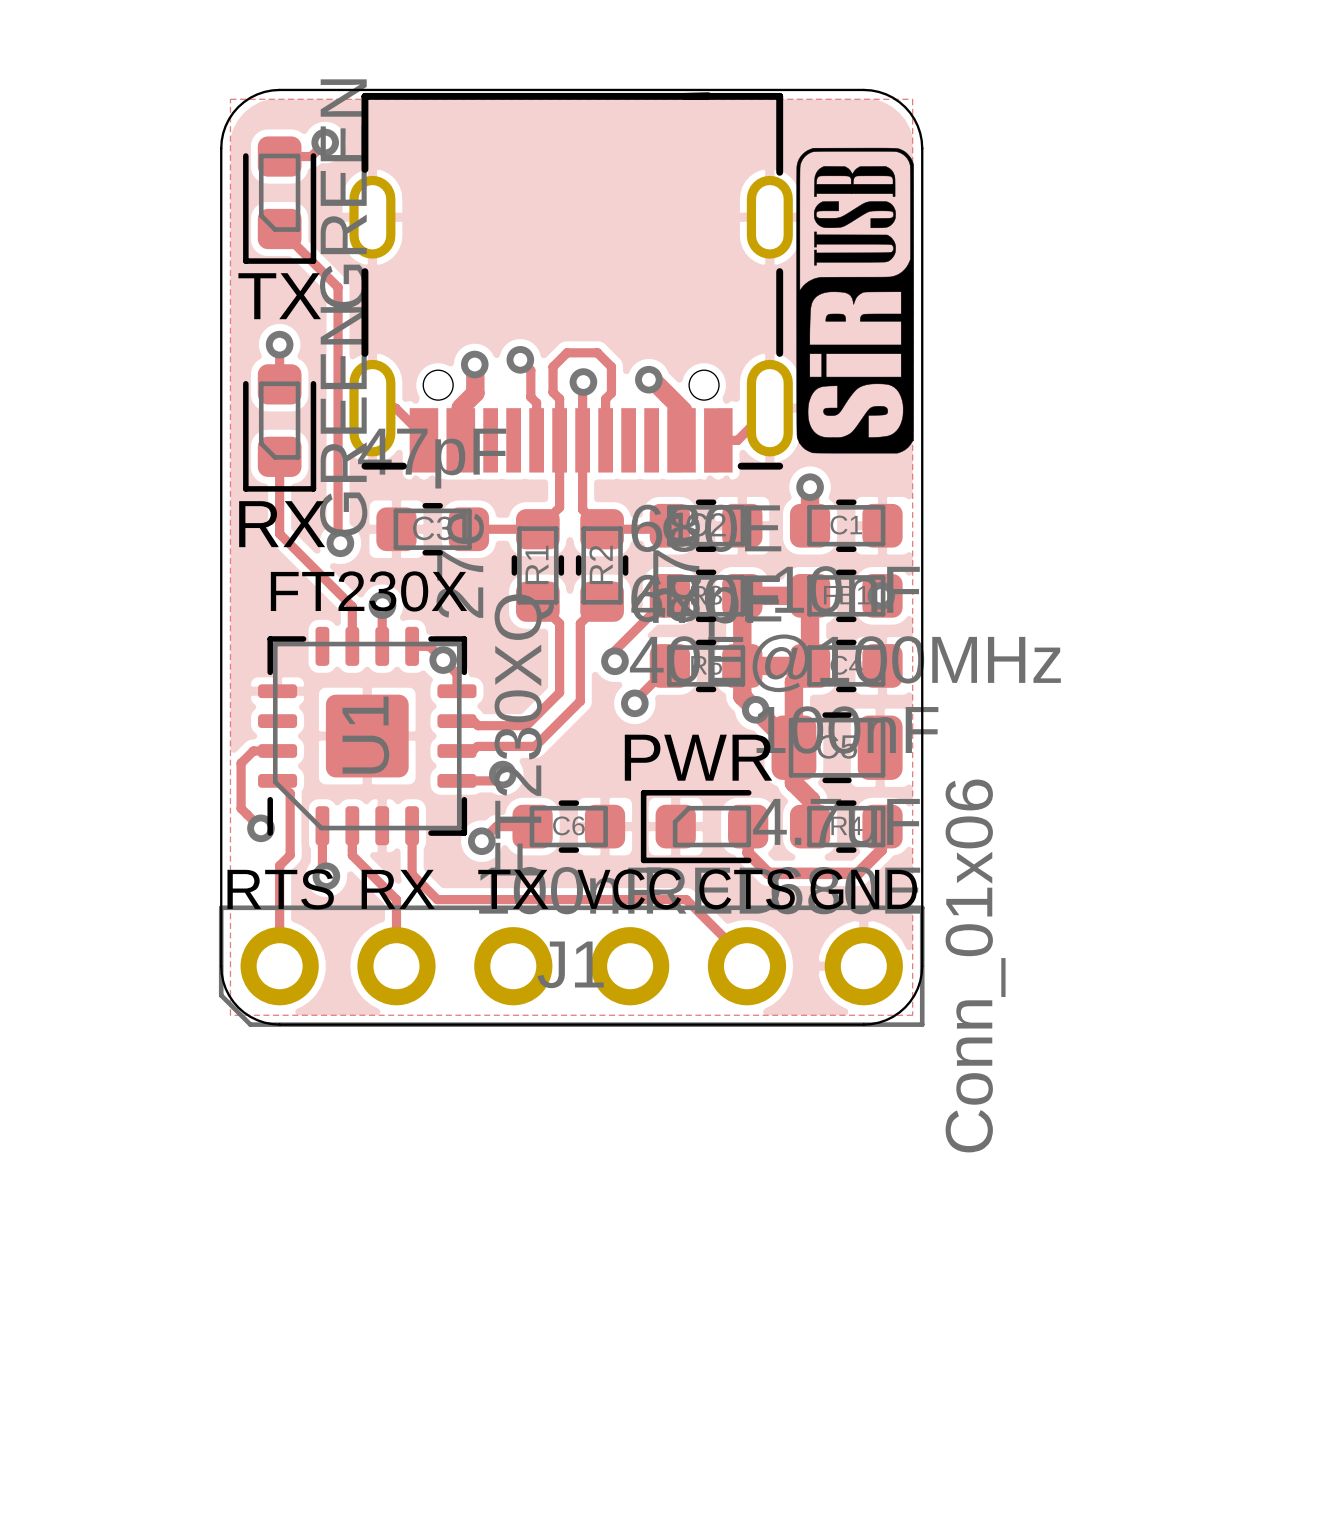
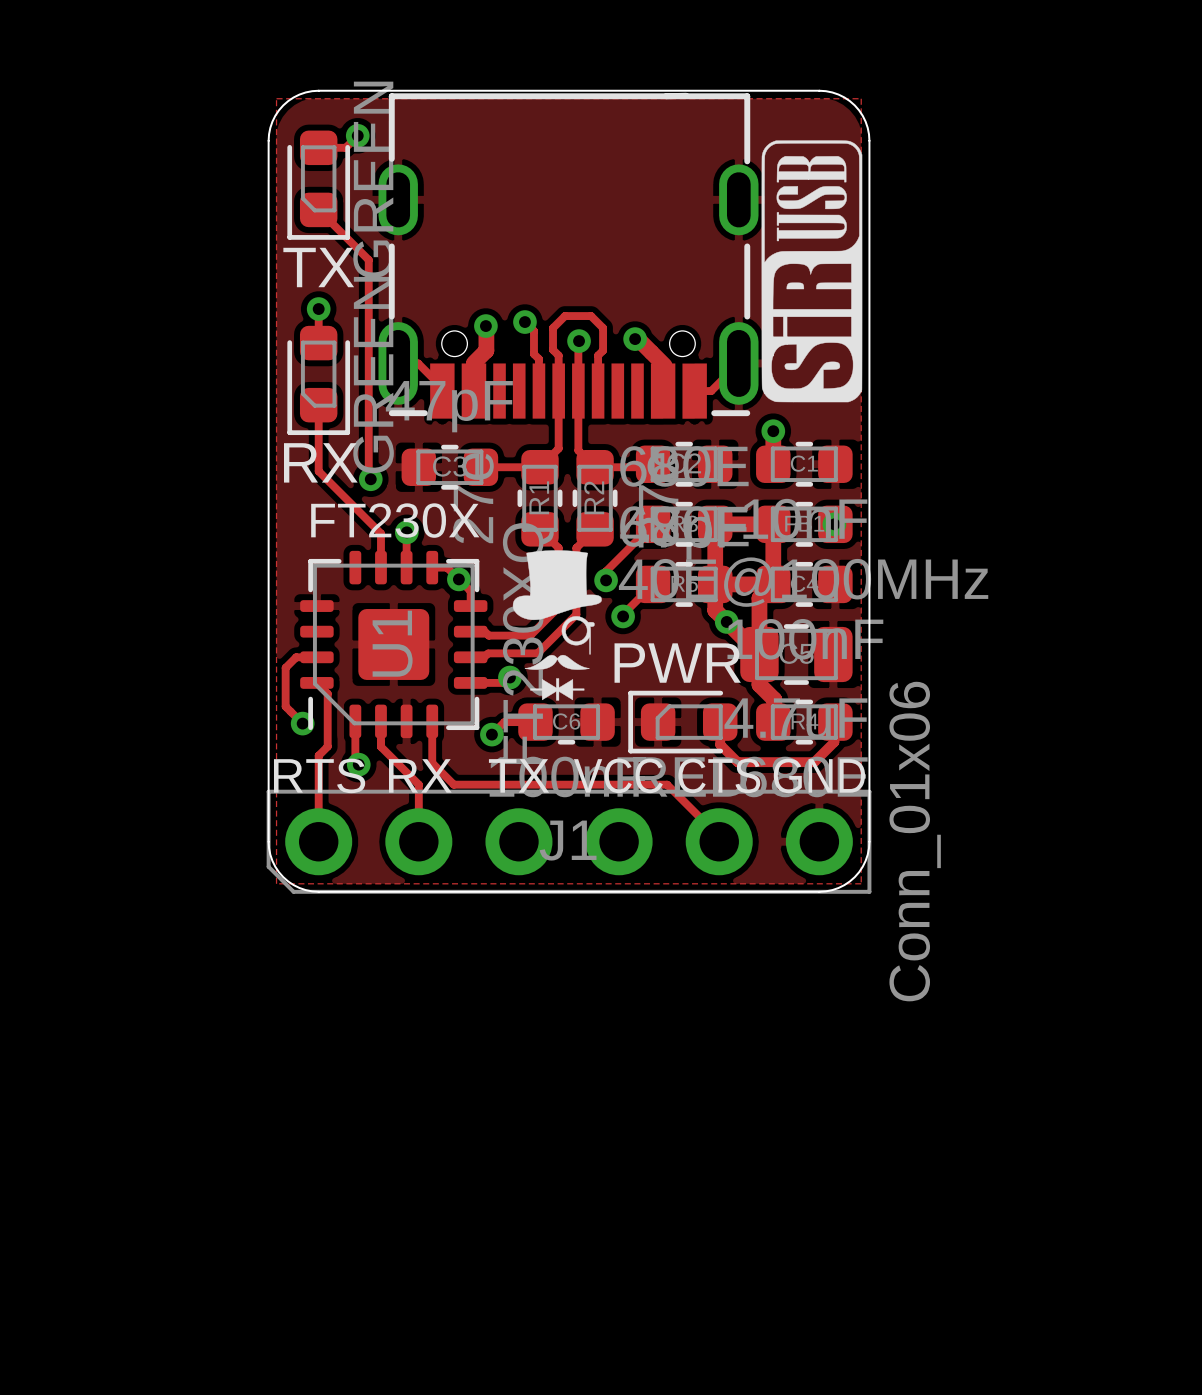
drawing: none -> [512, 550, 602, 701]
C6 footprint: [512, 800, 626, 853] -> [518, 703, 615, 745]

